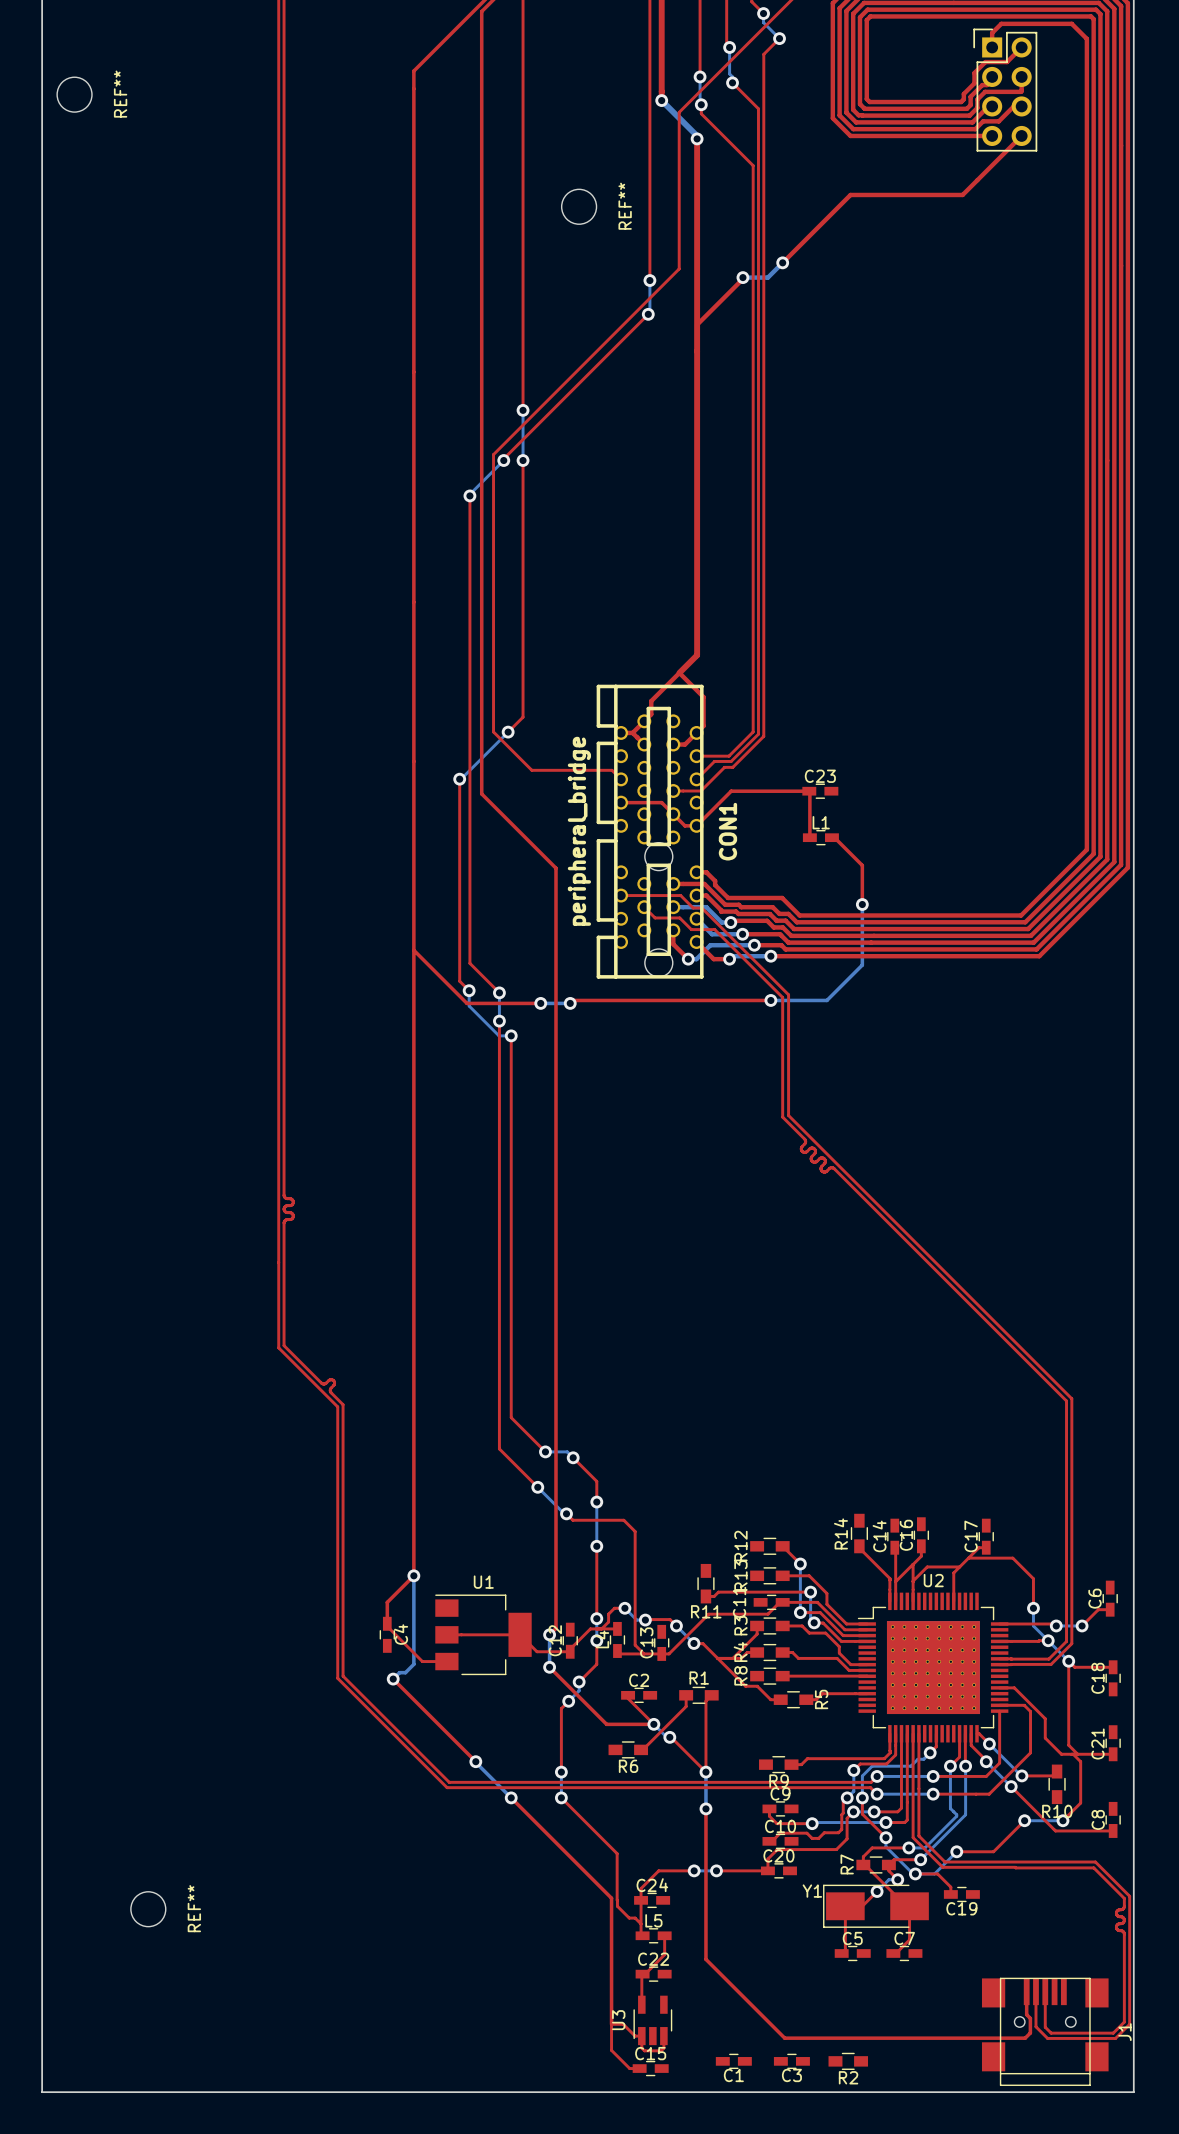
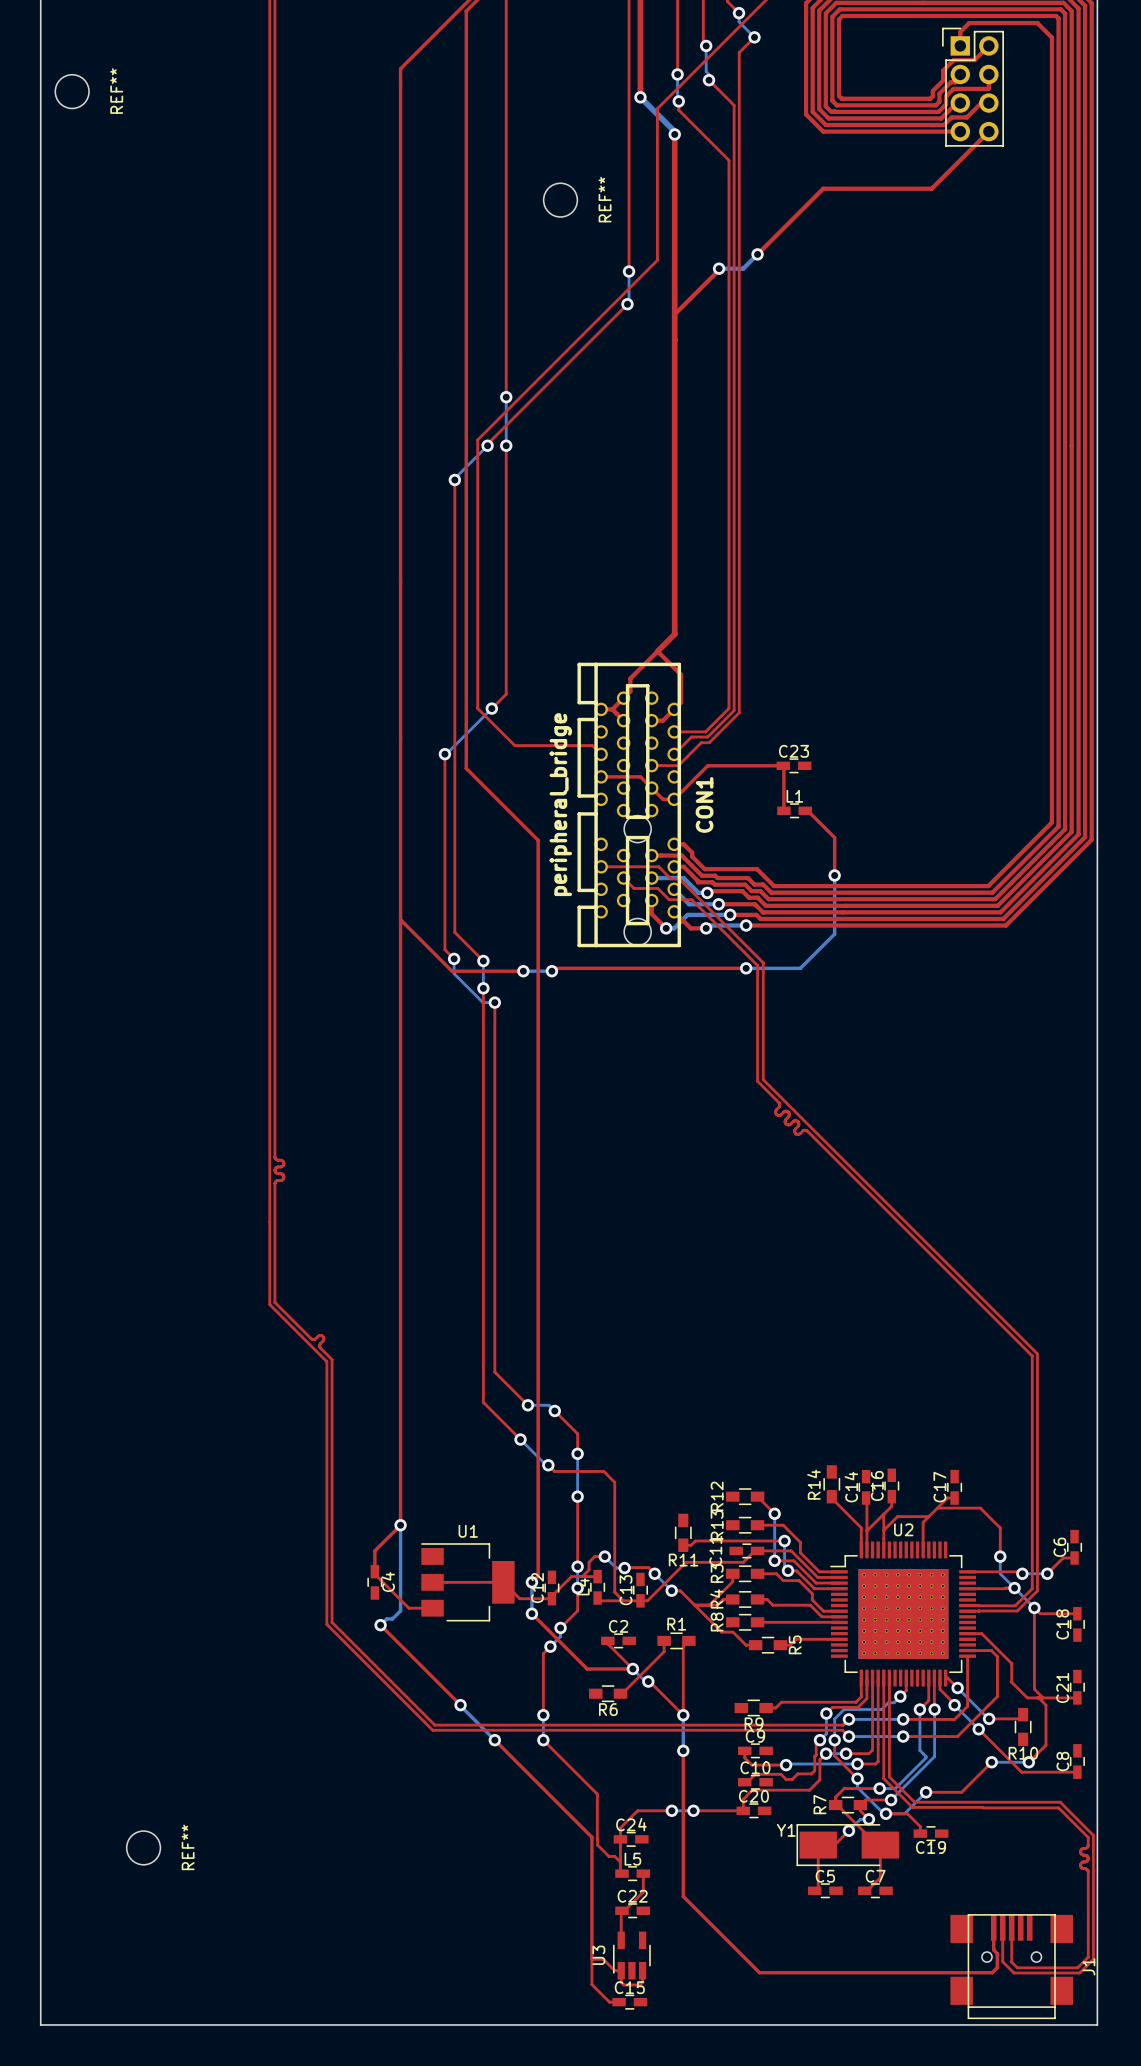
C1: (733, 2061) -> none
C3: (791, 2061) -> none
R2: (848, 2061) -> none

